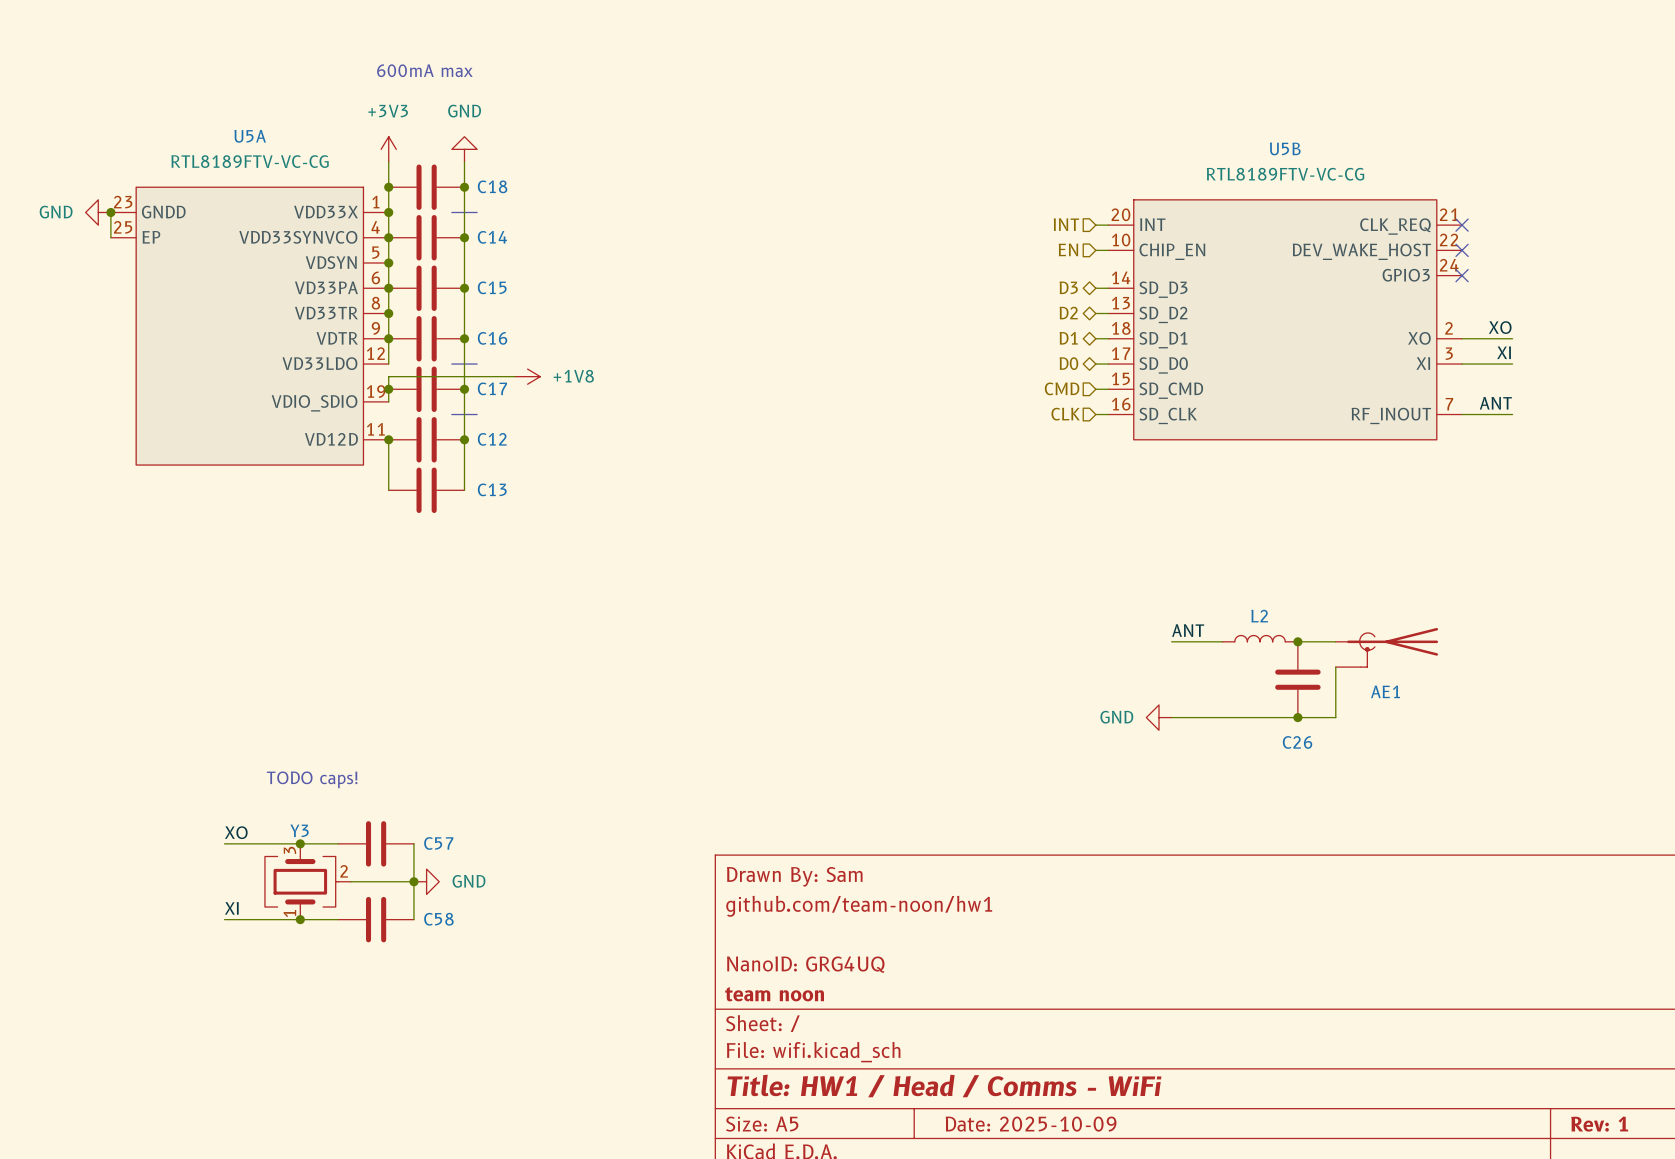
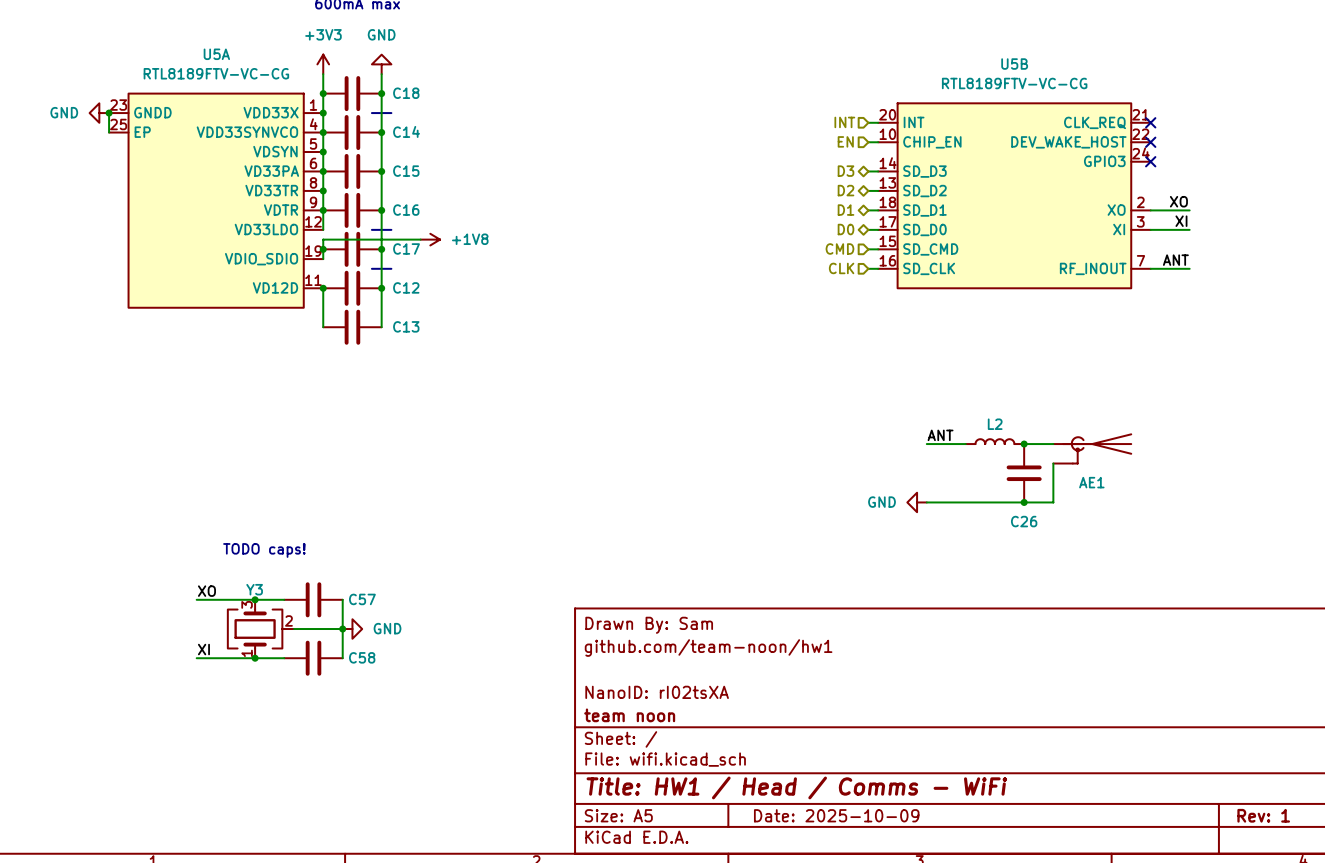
title block: NanoID: GRG4UQ (805, 964) -> NanoID: rI02tsXA (657, 692)

